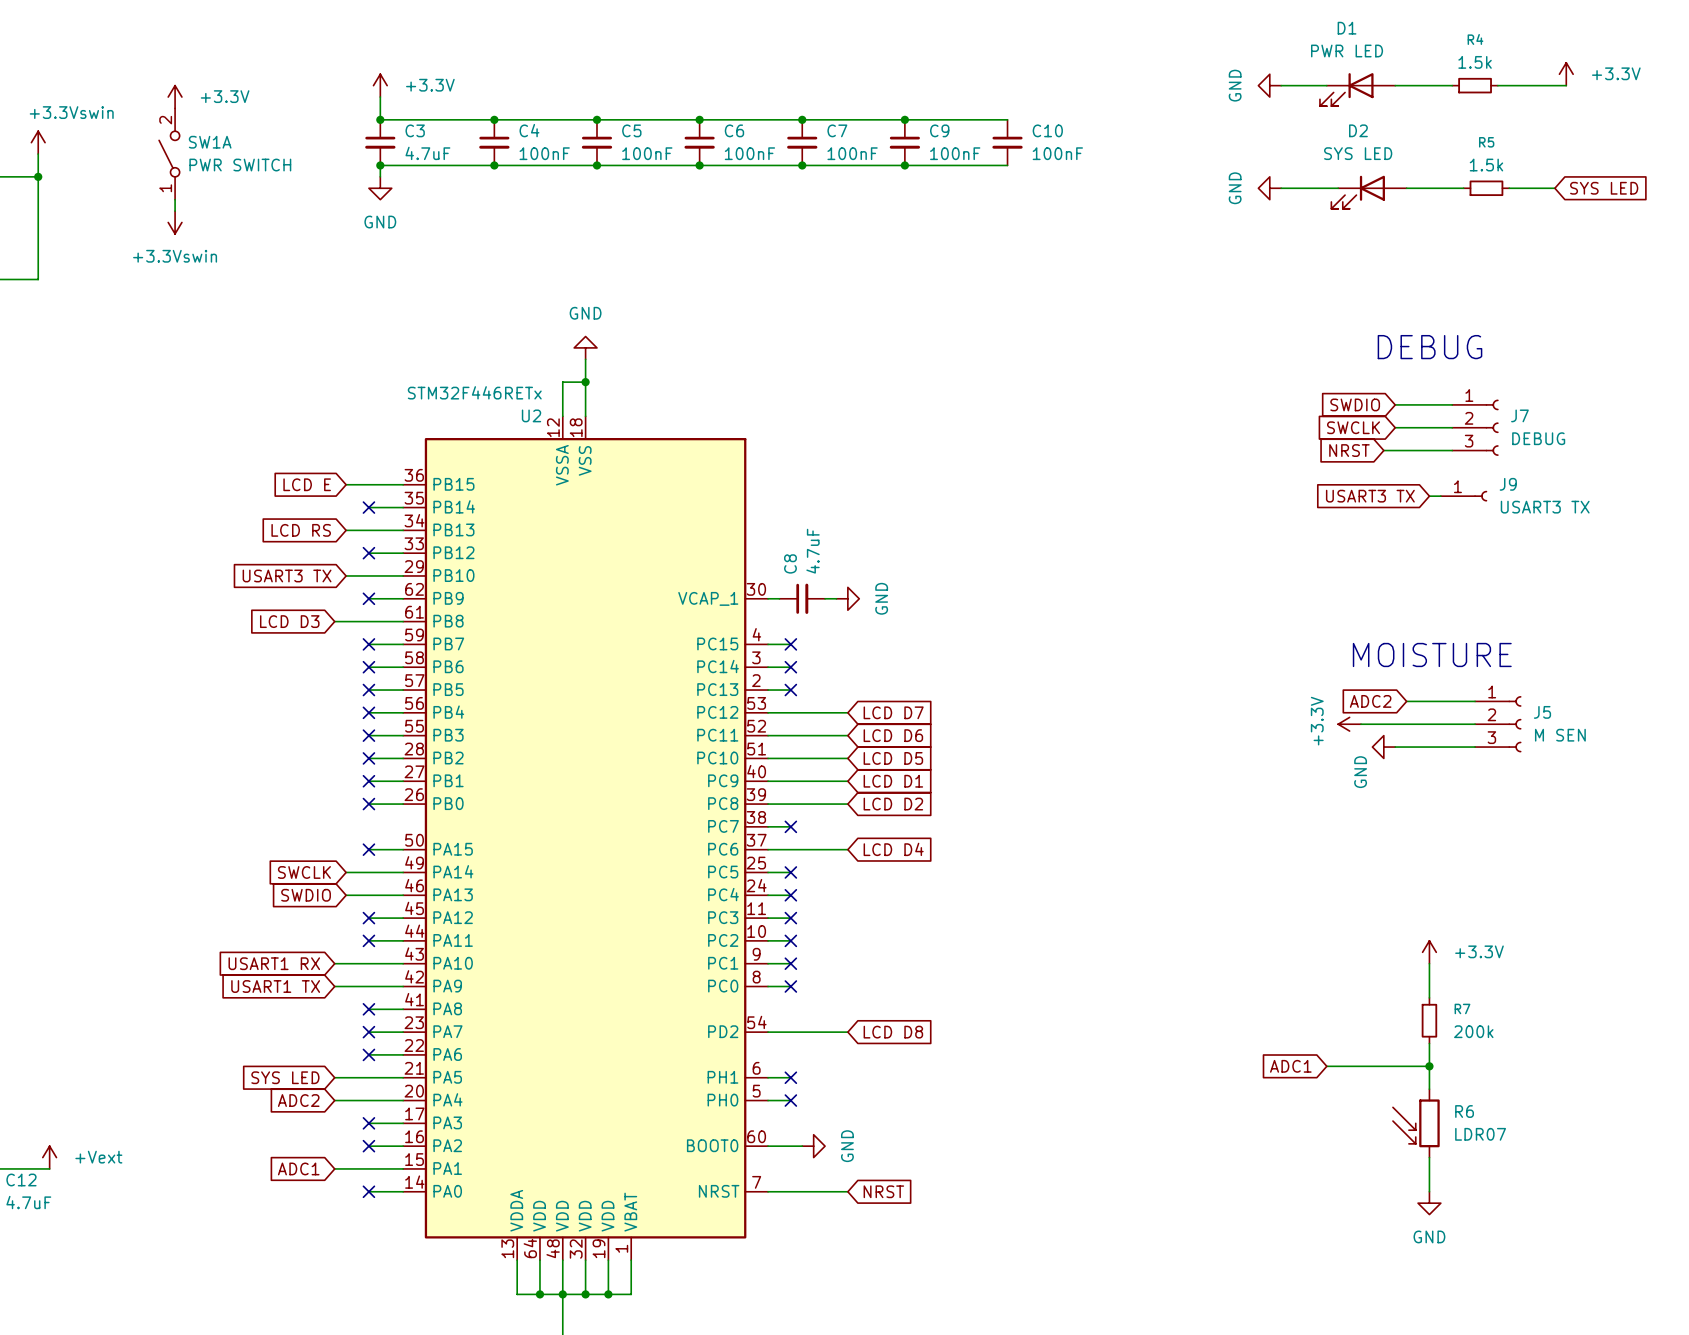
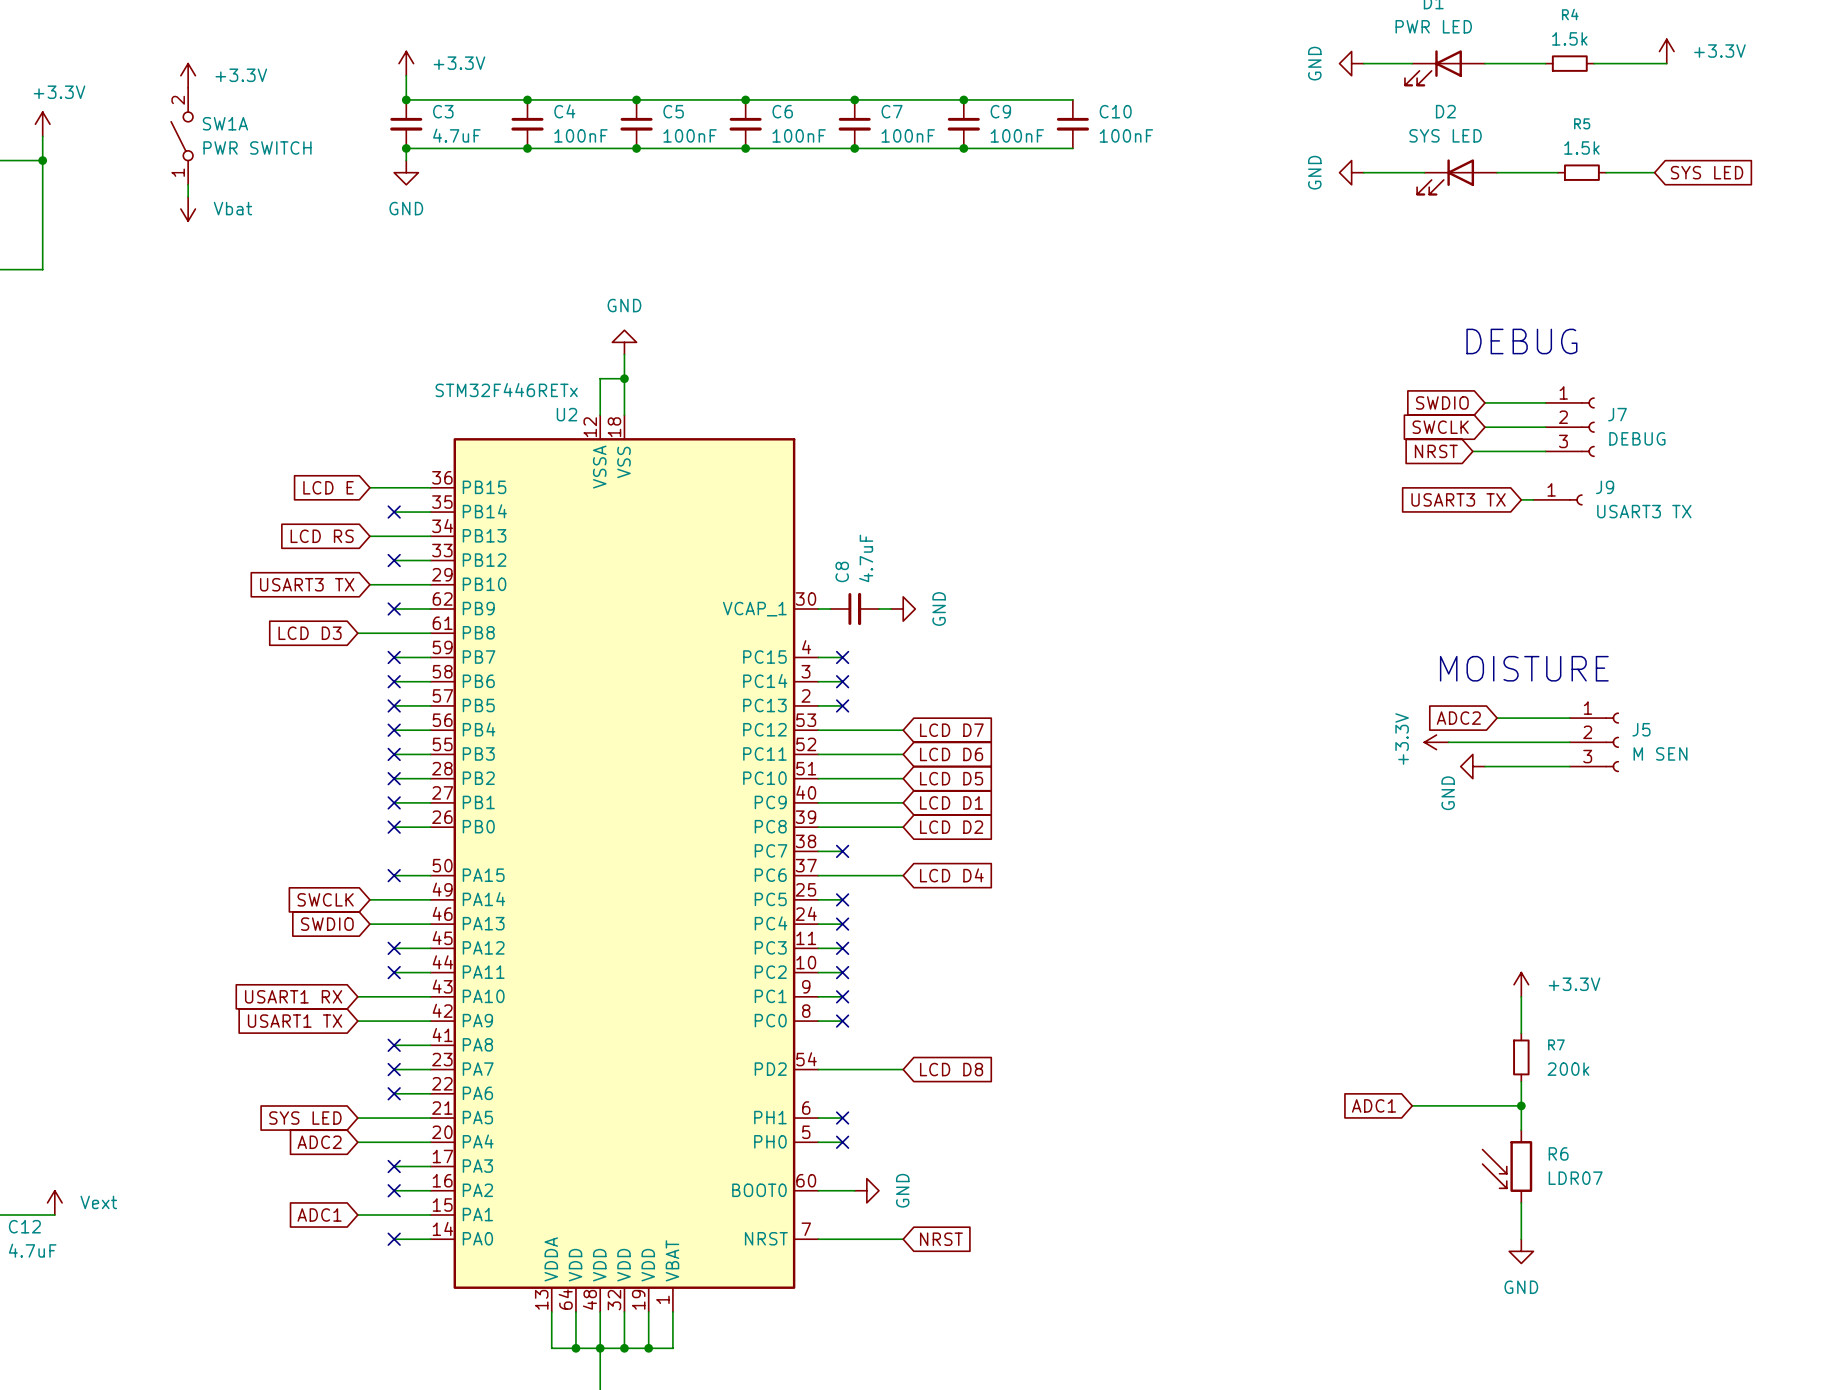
power symbol: +3.3Vswin (38, 142) -> +3.3V (42, 124)
power symbol: +3.3Vswin (175, 222) -> Vbat (188, 209)
power symbol: +Vext (49, 1157) -> Vext (54, 1202)

